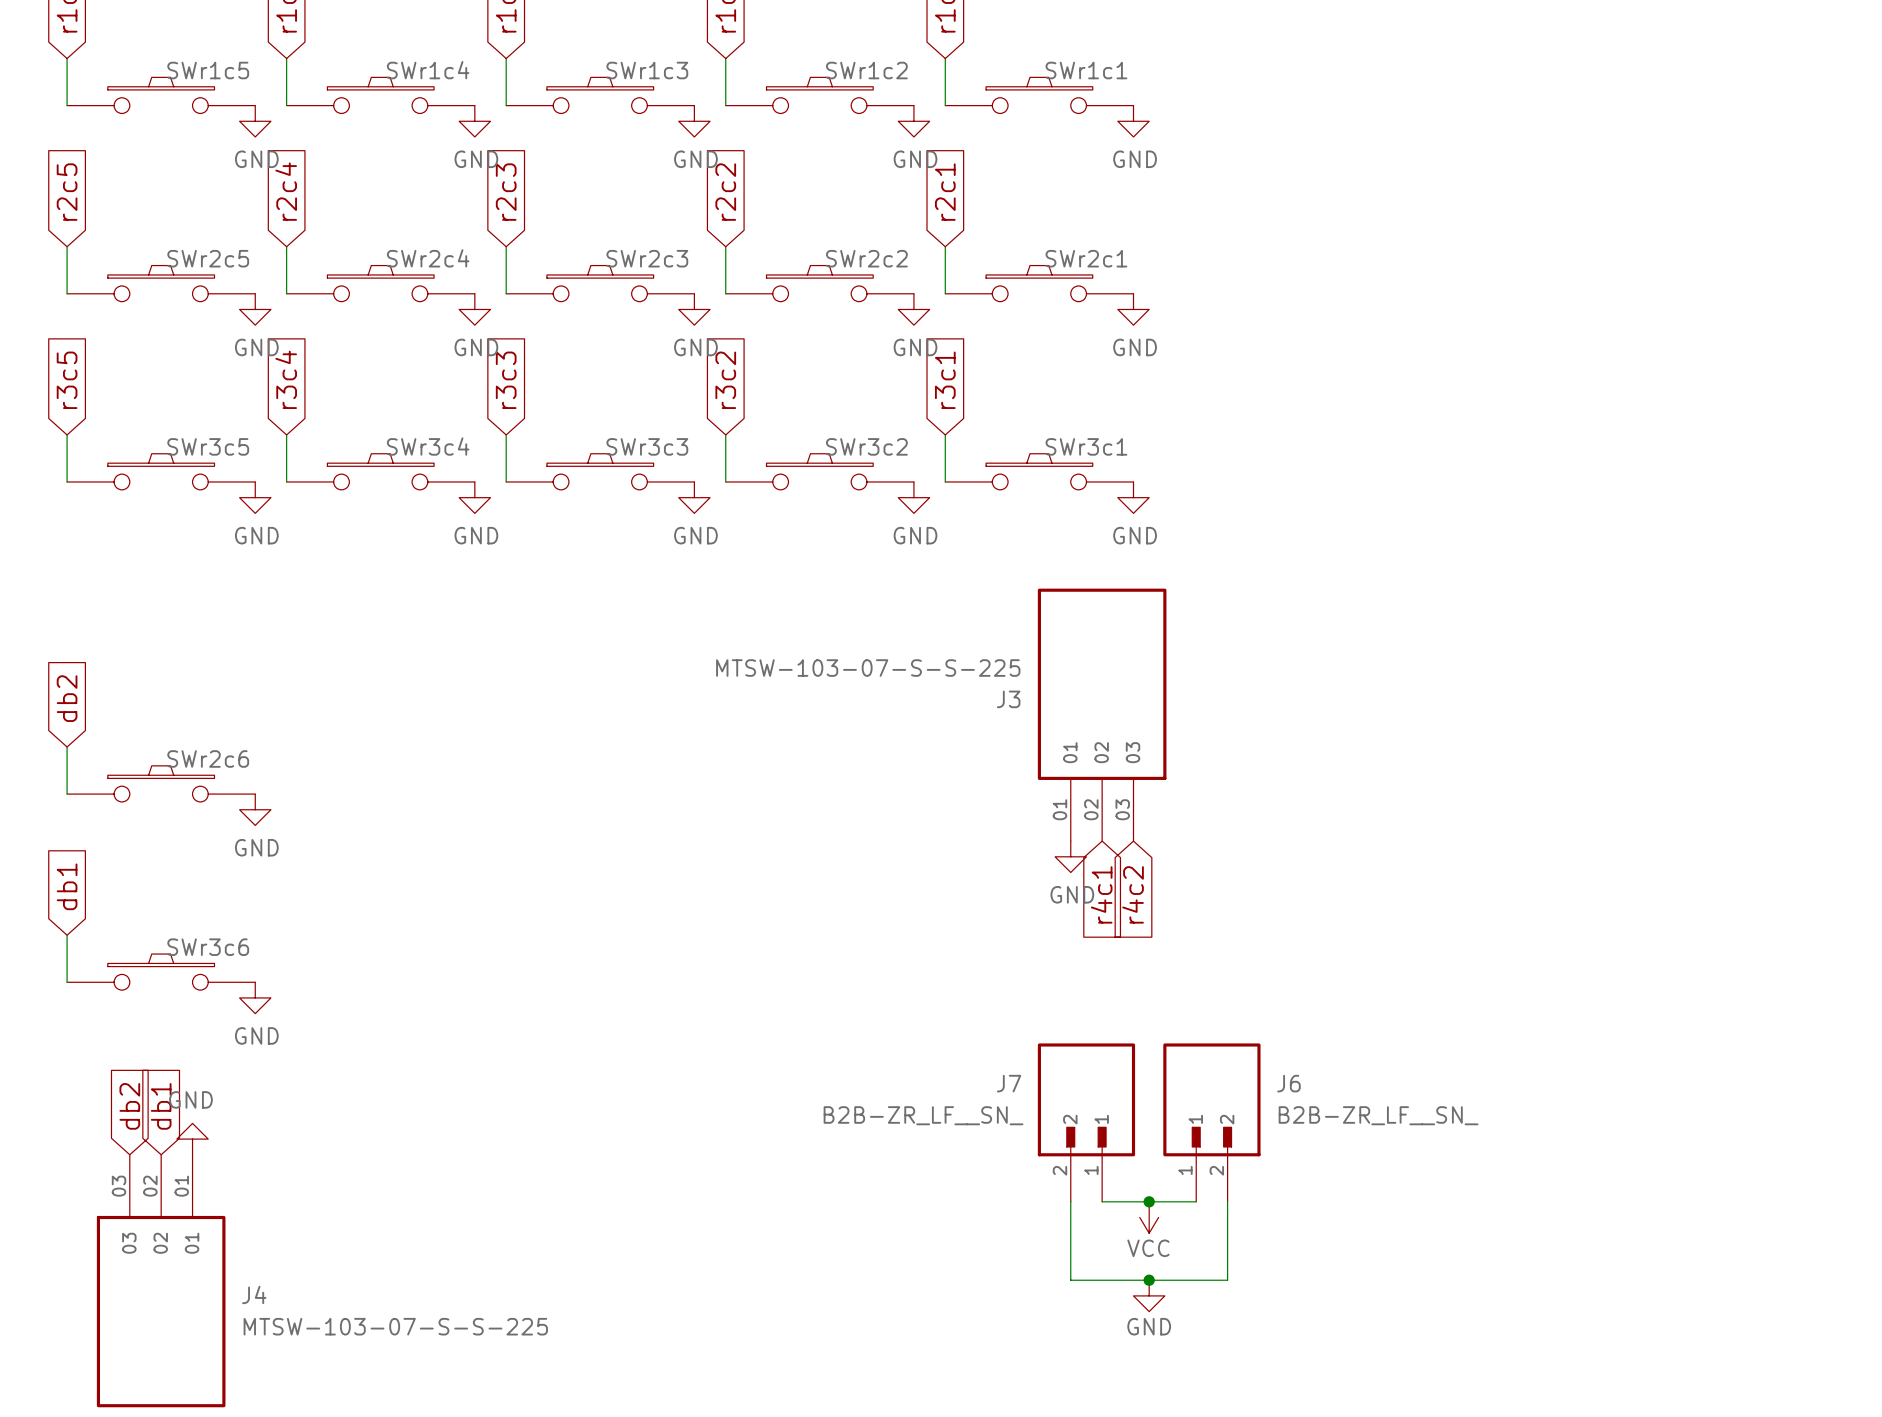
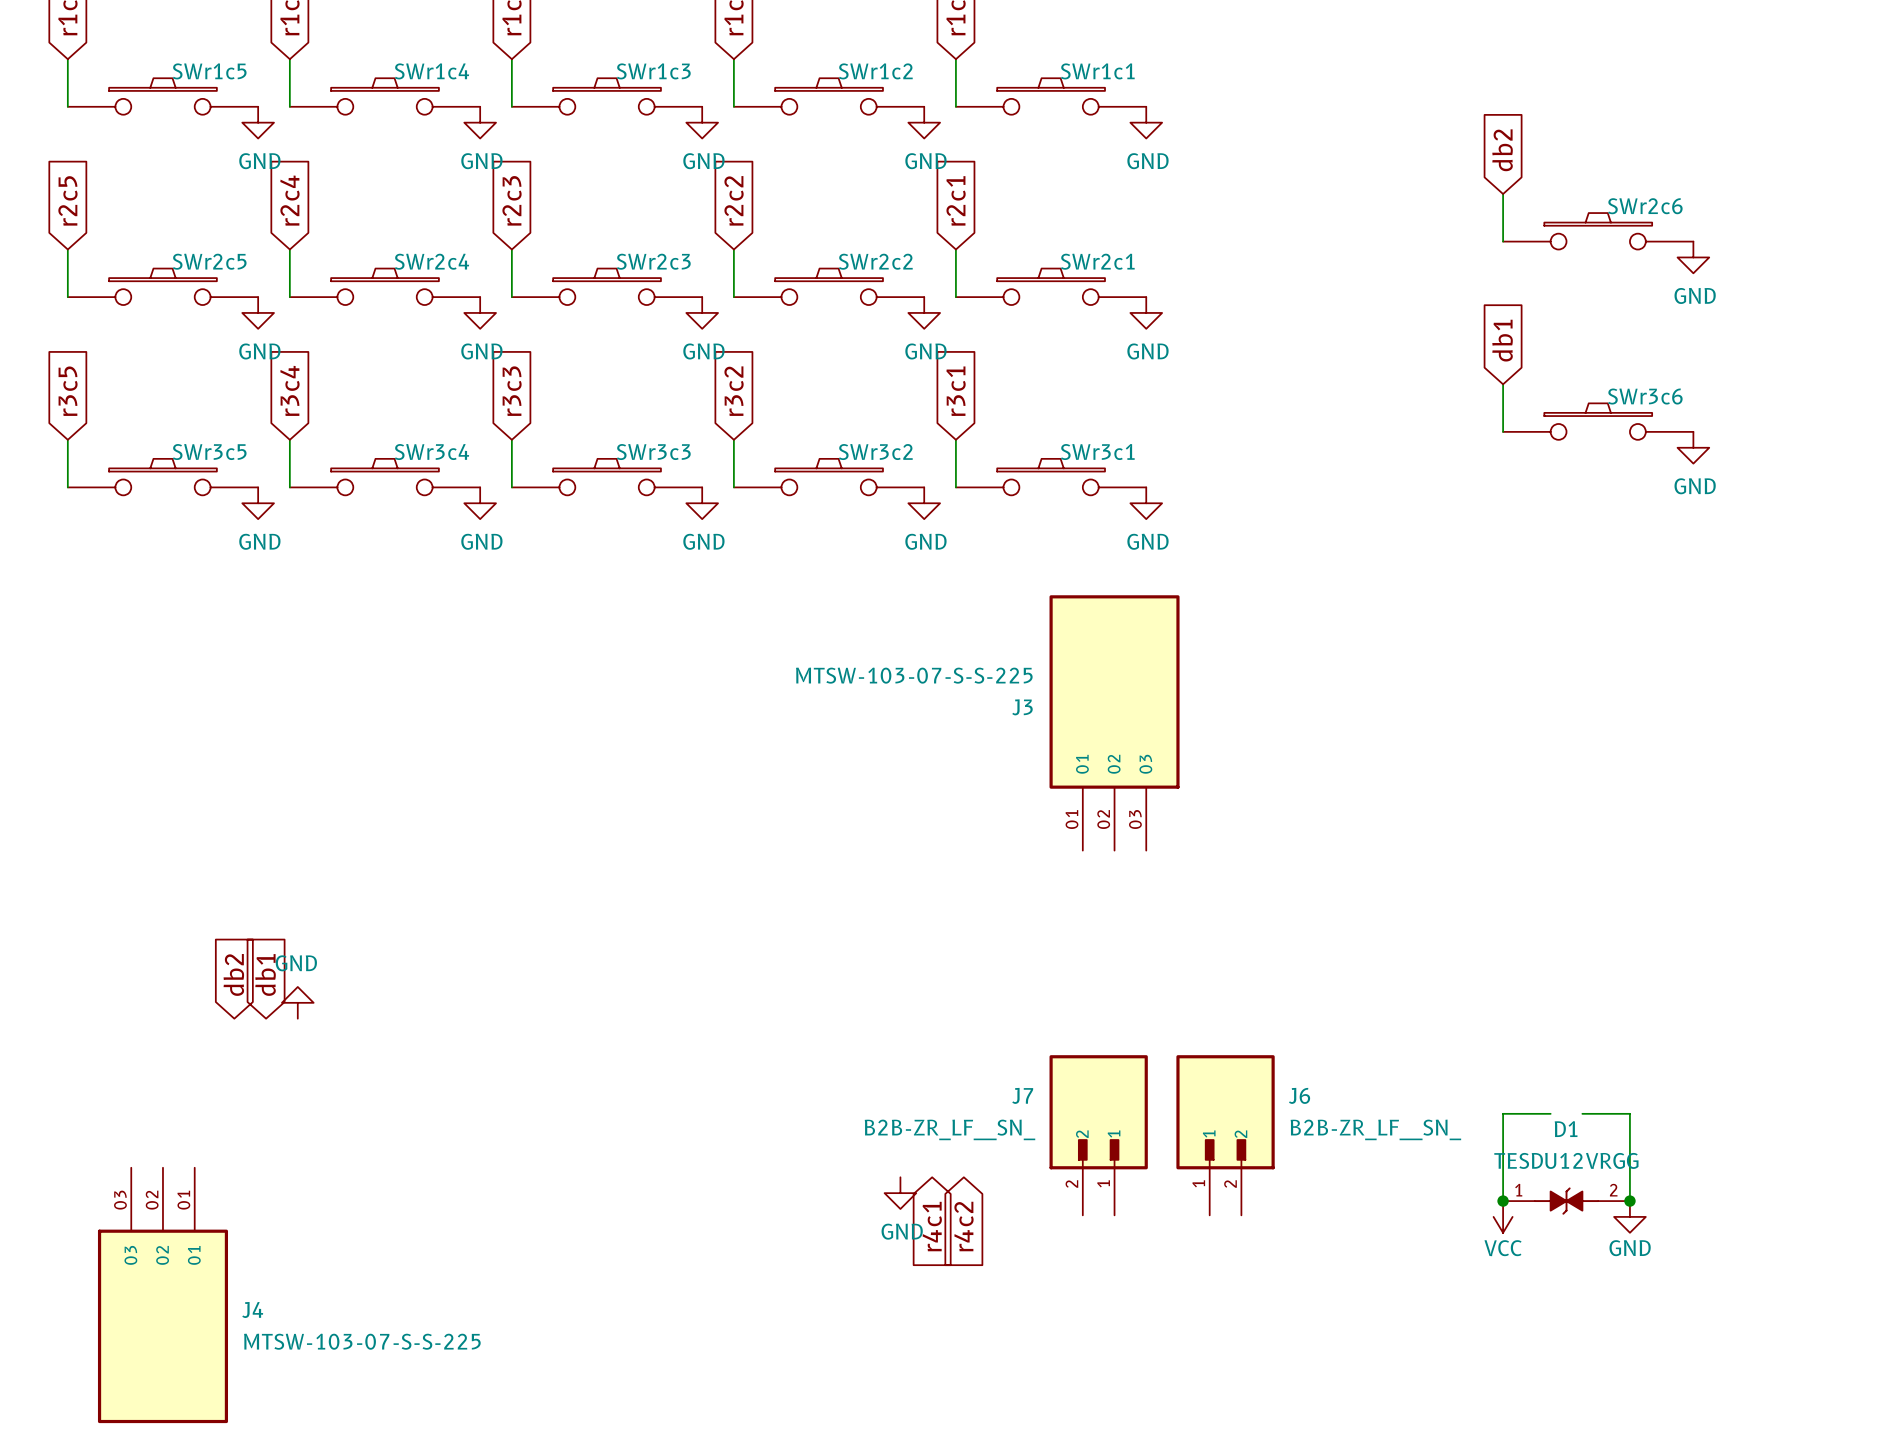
global label: none -> db2 (1502, 150)
wire: none -> (1503, 194) (1503, 241)
power symbol: none -> GND (1693, 257)
global label: none -> db1 (1502, 340)
wire: none -> (1503, 384) (1503, 431)
power symbol: none -> GND (1693, 447)
global label: db2 (67, 698) -> none
wire: (67, 747) (67, 794) -> none
SWr2c6 position: (161, 783) -> (1598, 231)
power symbol: GND (255, 809) -> none
power symbol: GND (1070, 856) -> none
global label: db1 (67, 886) -> none
global label: r4c1 (1101, 894) -> none
global label: r4c2 (1133, 894) -> none
wire: (67, 935) (67, 982) -> none
global label: none -> db2 (233, 974)
global label: none -> db1 (265, 974)
SWr3c6 position: (161, 972) -> (1598, 421)
power symbol rotation: 0° (255, 997) -> 180° (297, 1002)
power symbol position: GND (255, 997) -> GND (297, 1002)
wire: none -> (1550, 1113) (1503, 1113) (1503, 1201)
wire: none -> (1582, 1113) (1629, 1113) (1629, 1201)
global label: db2 (129, 1106) -> none
global label: db1 (161, 1106) -> none
power symbol: GND (192, 1139) -> none
power symbol: none -> GND (900, 1193)
junction: none -> (1503, 1201)
D1: none -> TESDU12VRGG (1566, 1201)
junction: none -> (1629, 1201)
wire: (1070, 1201) (1070, 1280) (1227, 1280) (1227, 1201) -> none
wire: (1102, 1201) (1196, 1201) -> none
junction: (1149, 1201) -> none
power symbol: none -> VCC (1503, 1216)
power symbol: none -> GND (1629, 1216)
global label: none -> r4c1 (932, 1226)
global label: none -> r4c2 (963, 1226)
power symbol: VCC (1149, 1217) -> none
junction: (1149, 1280) -> none
power symbol: GND (1149, 1295) -> none

